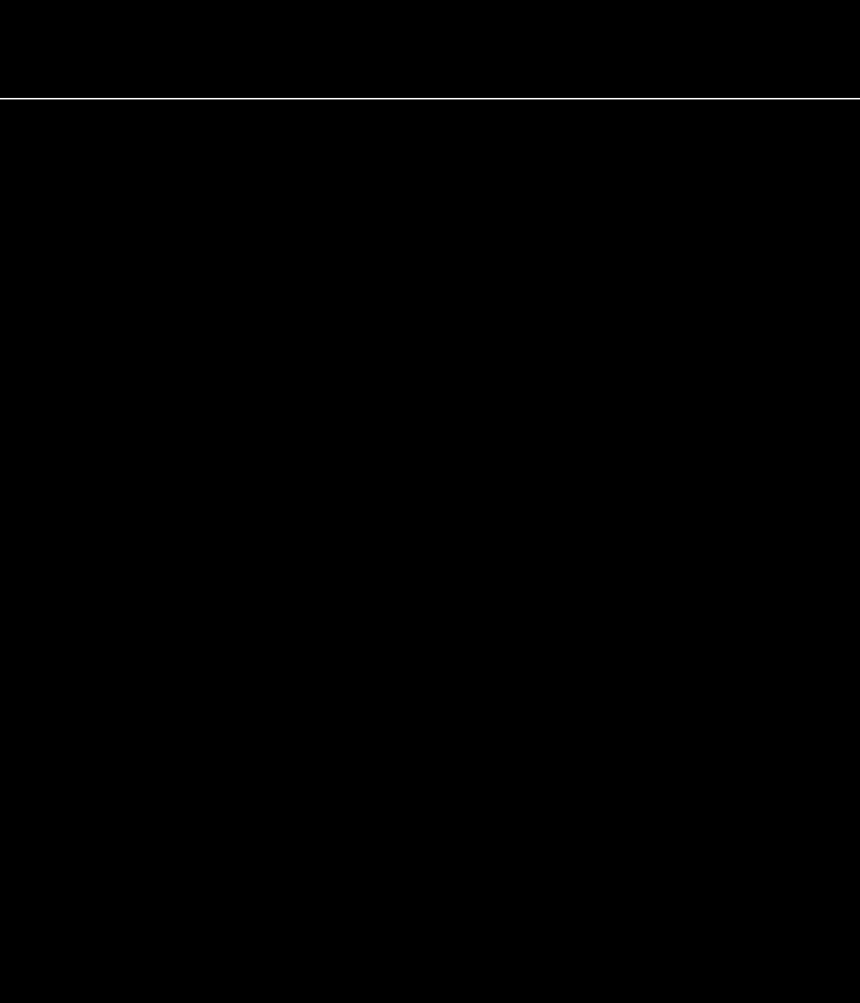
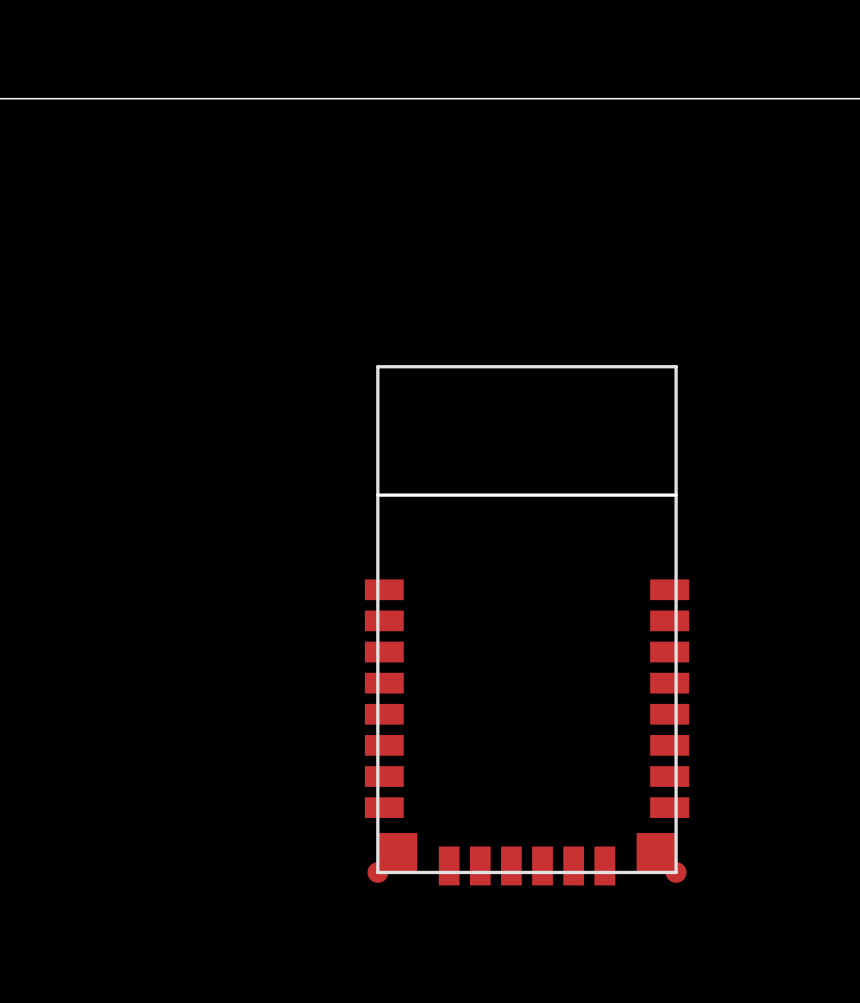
part: none -> (526, 625)

